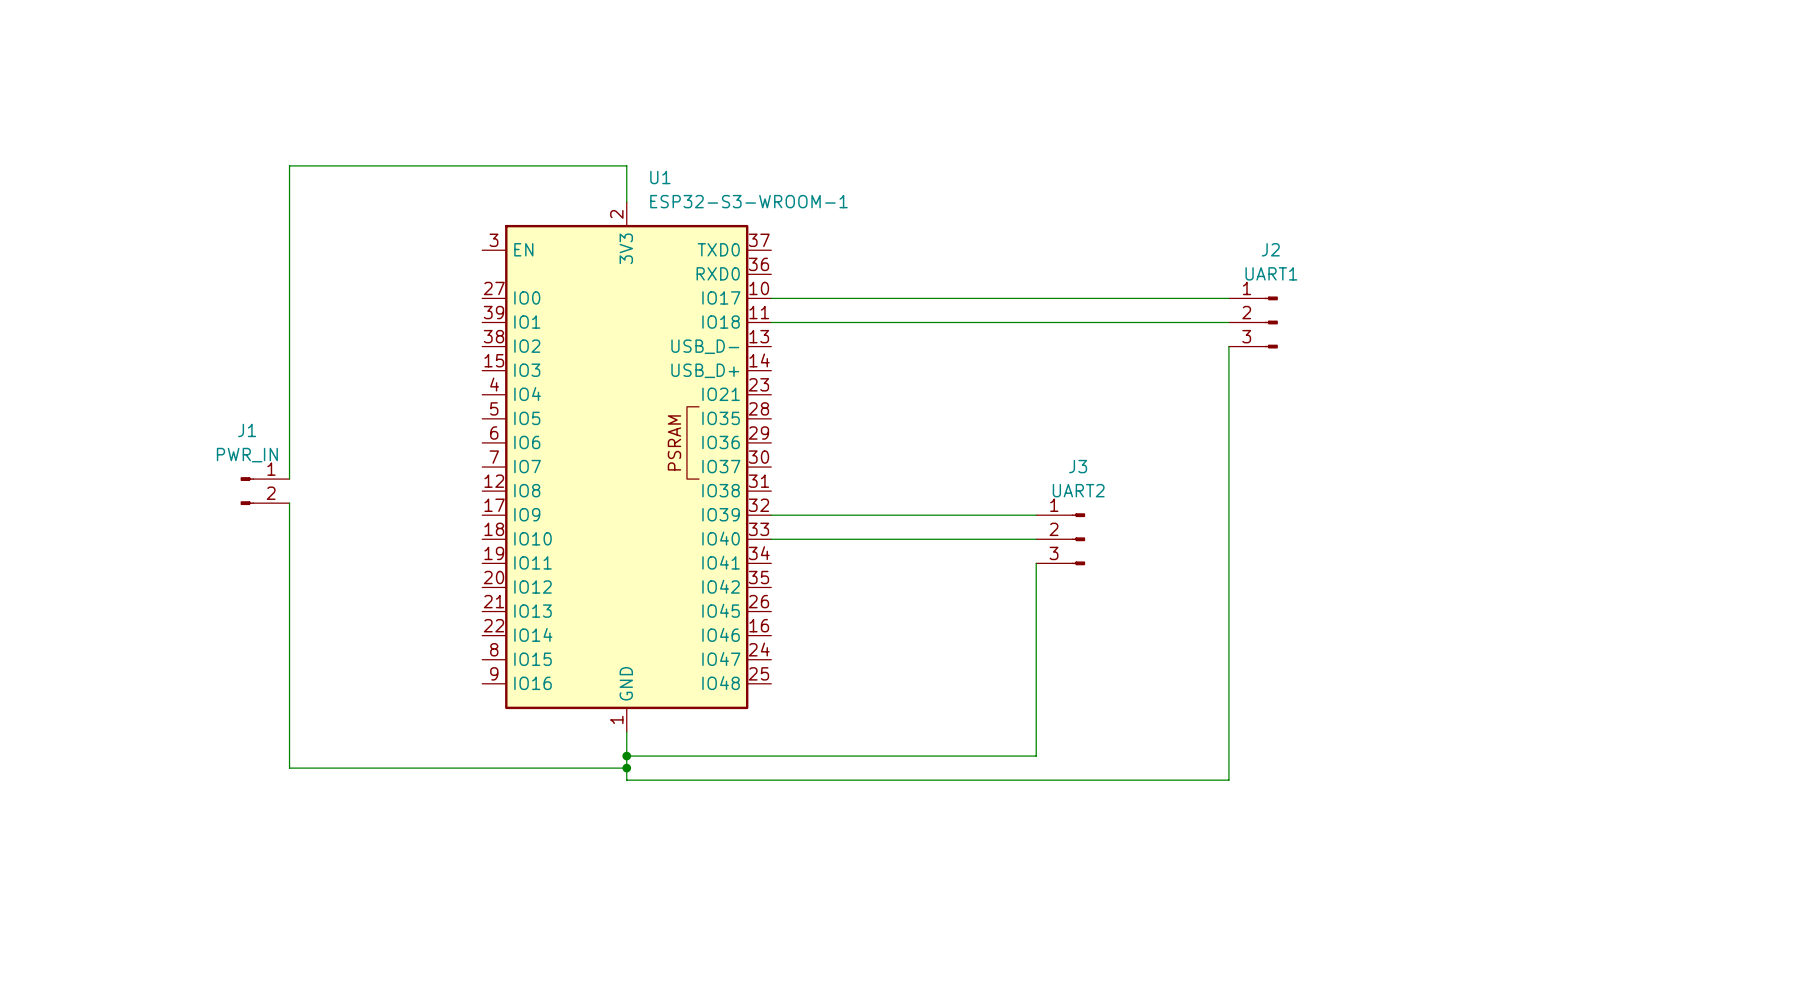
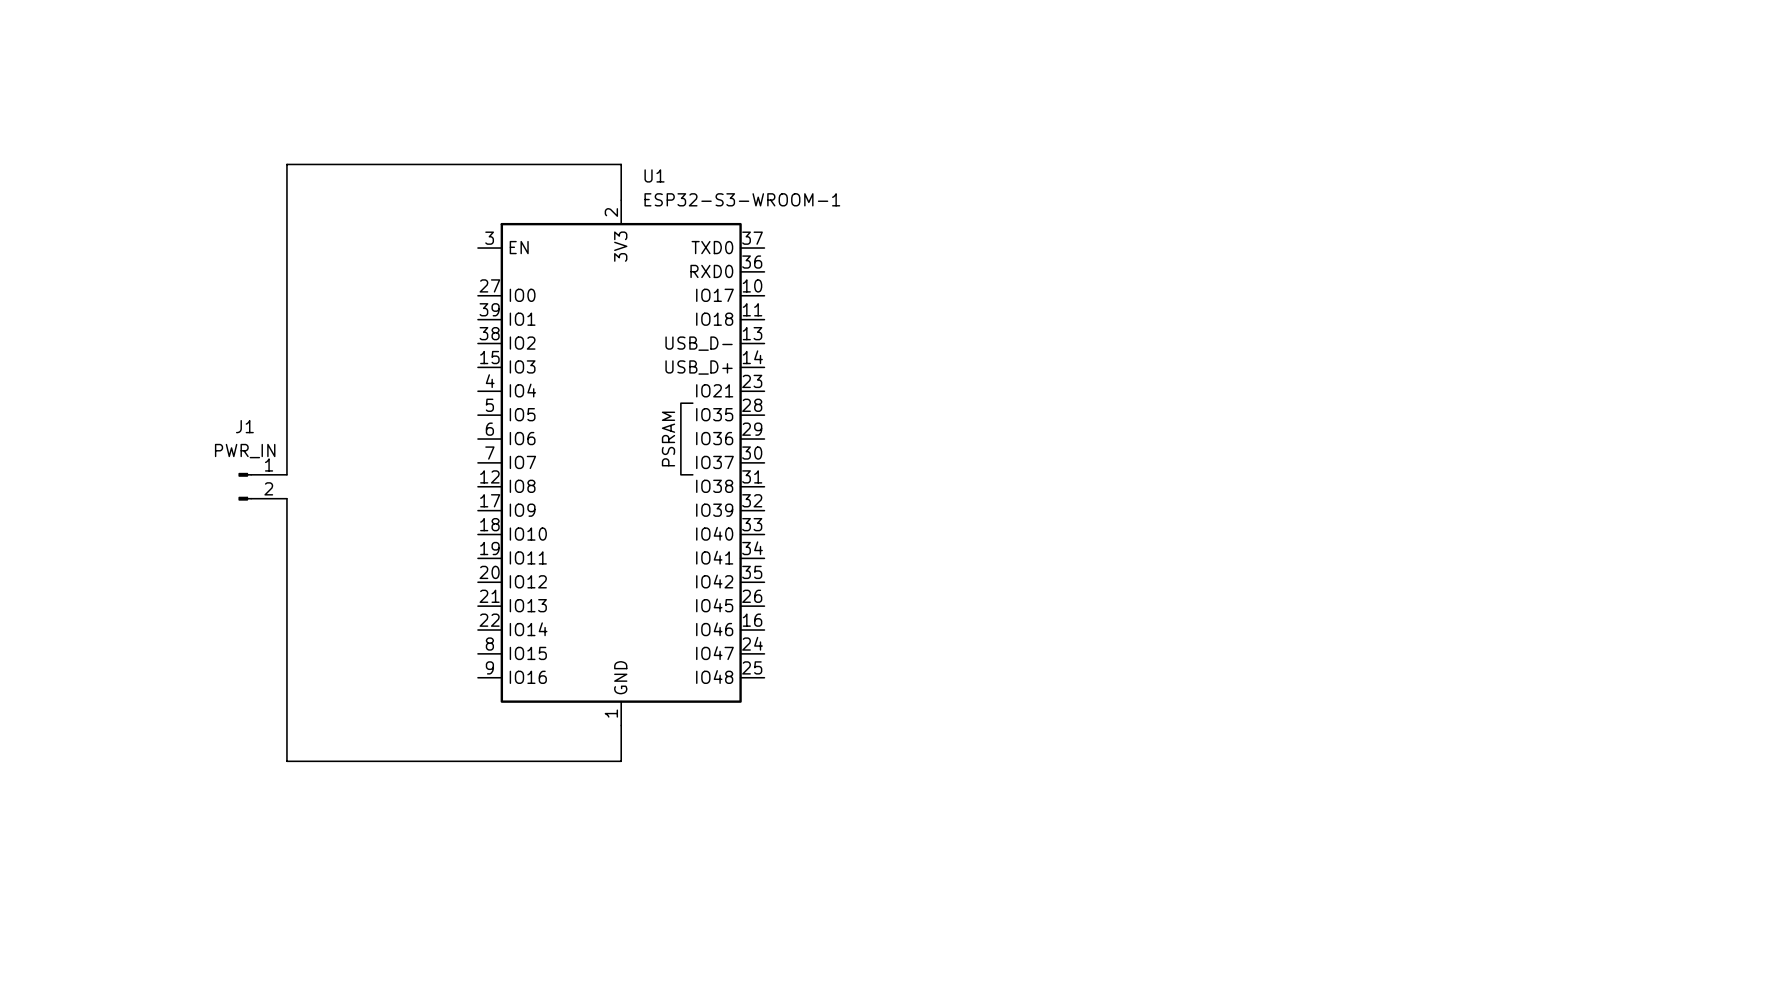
wire: (771, 298) (1228, 298) -> none
wire: (771, 322) (1228, 322) -> none
J2: UART1 (1253, 322) -> none
wire: (1228, 346) (1228, 780) (626, 780) (626, 768) -> none
wire: (771, 515) (1036, 515) -> none
wire: (771, 539) (1036, 539) -> none
J3: UART2 (1060, 539) -> none
wire: (1036, 563) (1036, 756) (626, 756) -> none
junction: (626, 756) -> none
junction: (626, 768) -> none

